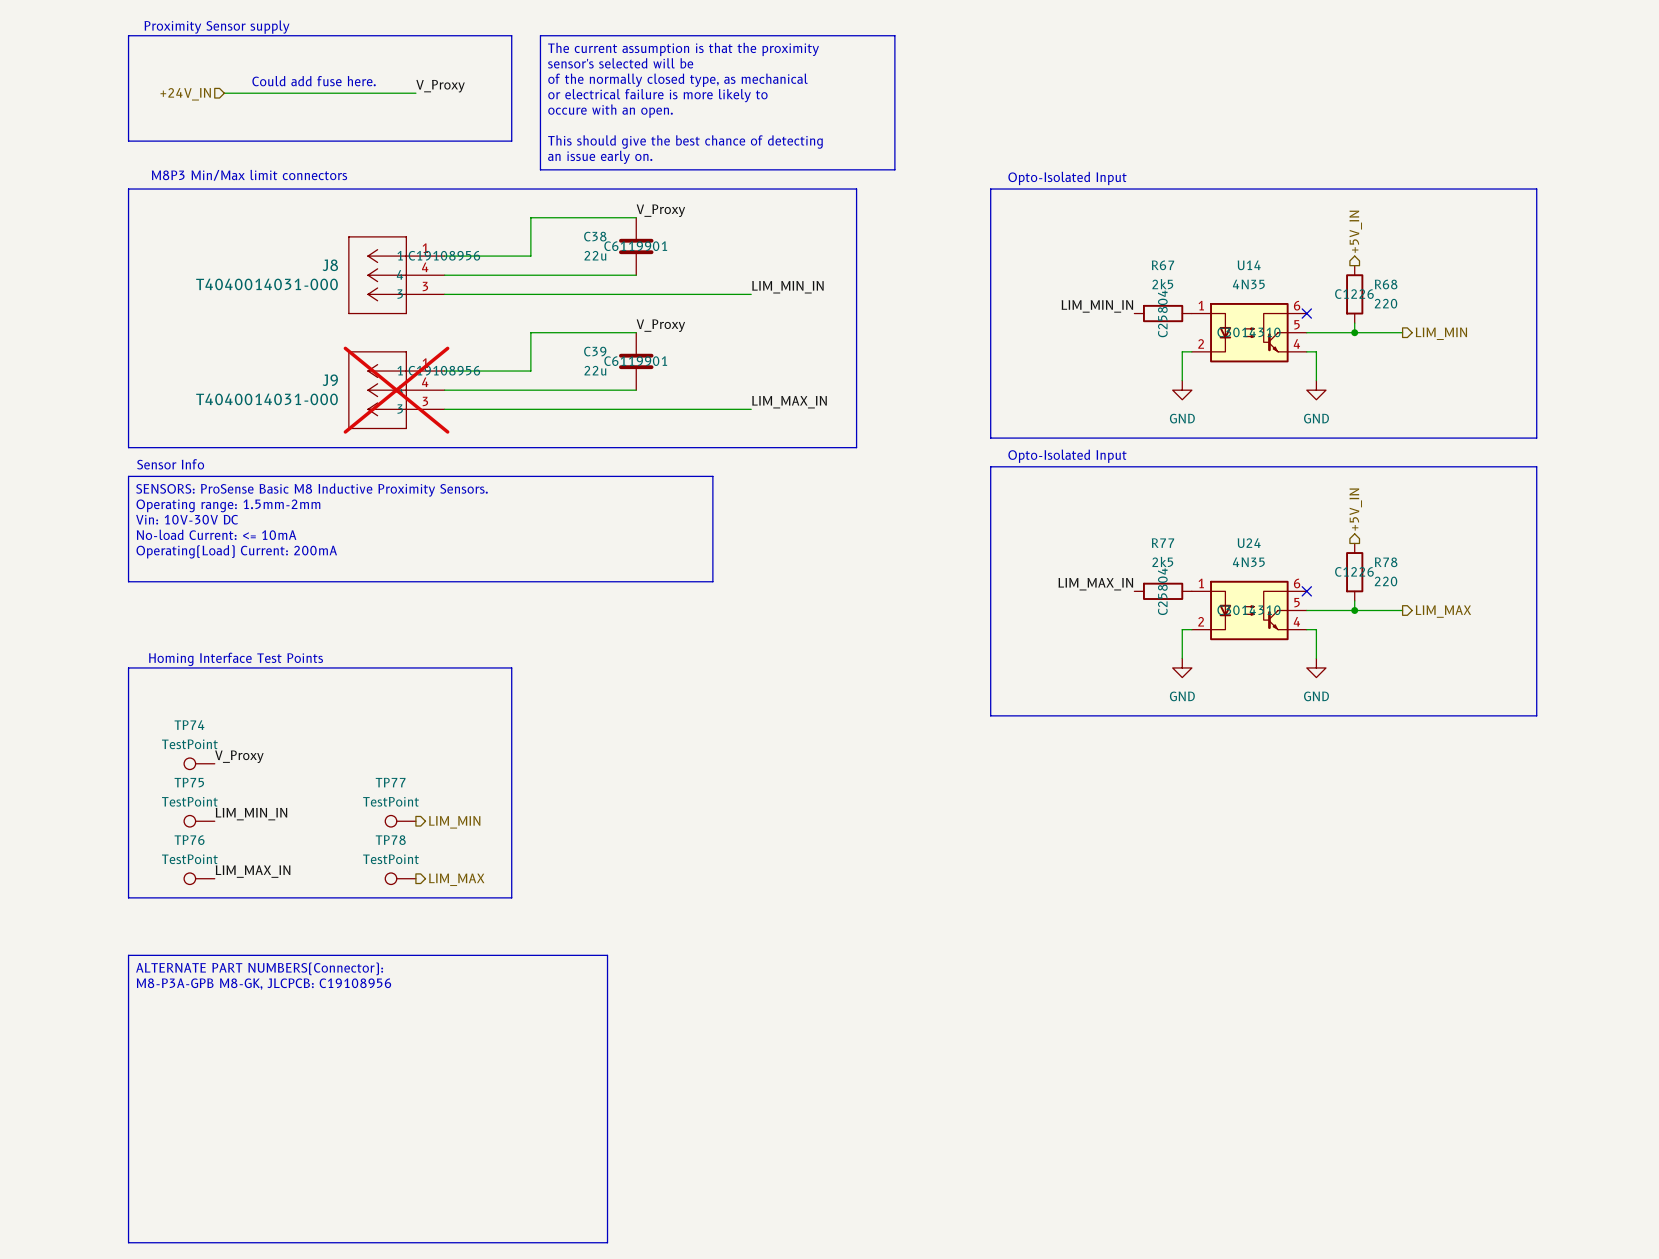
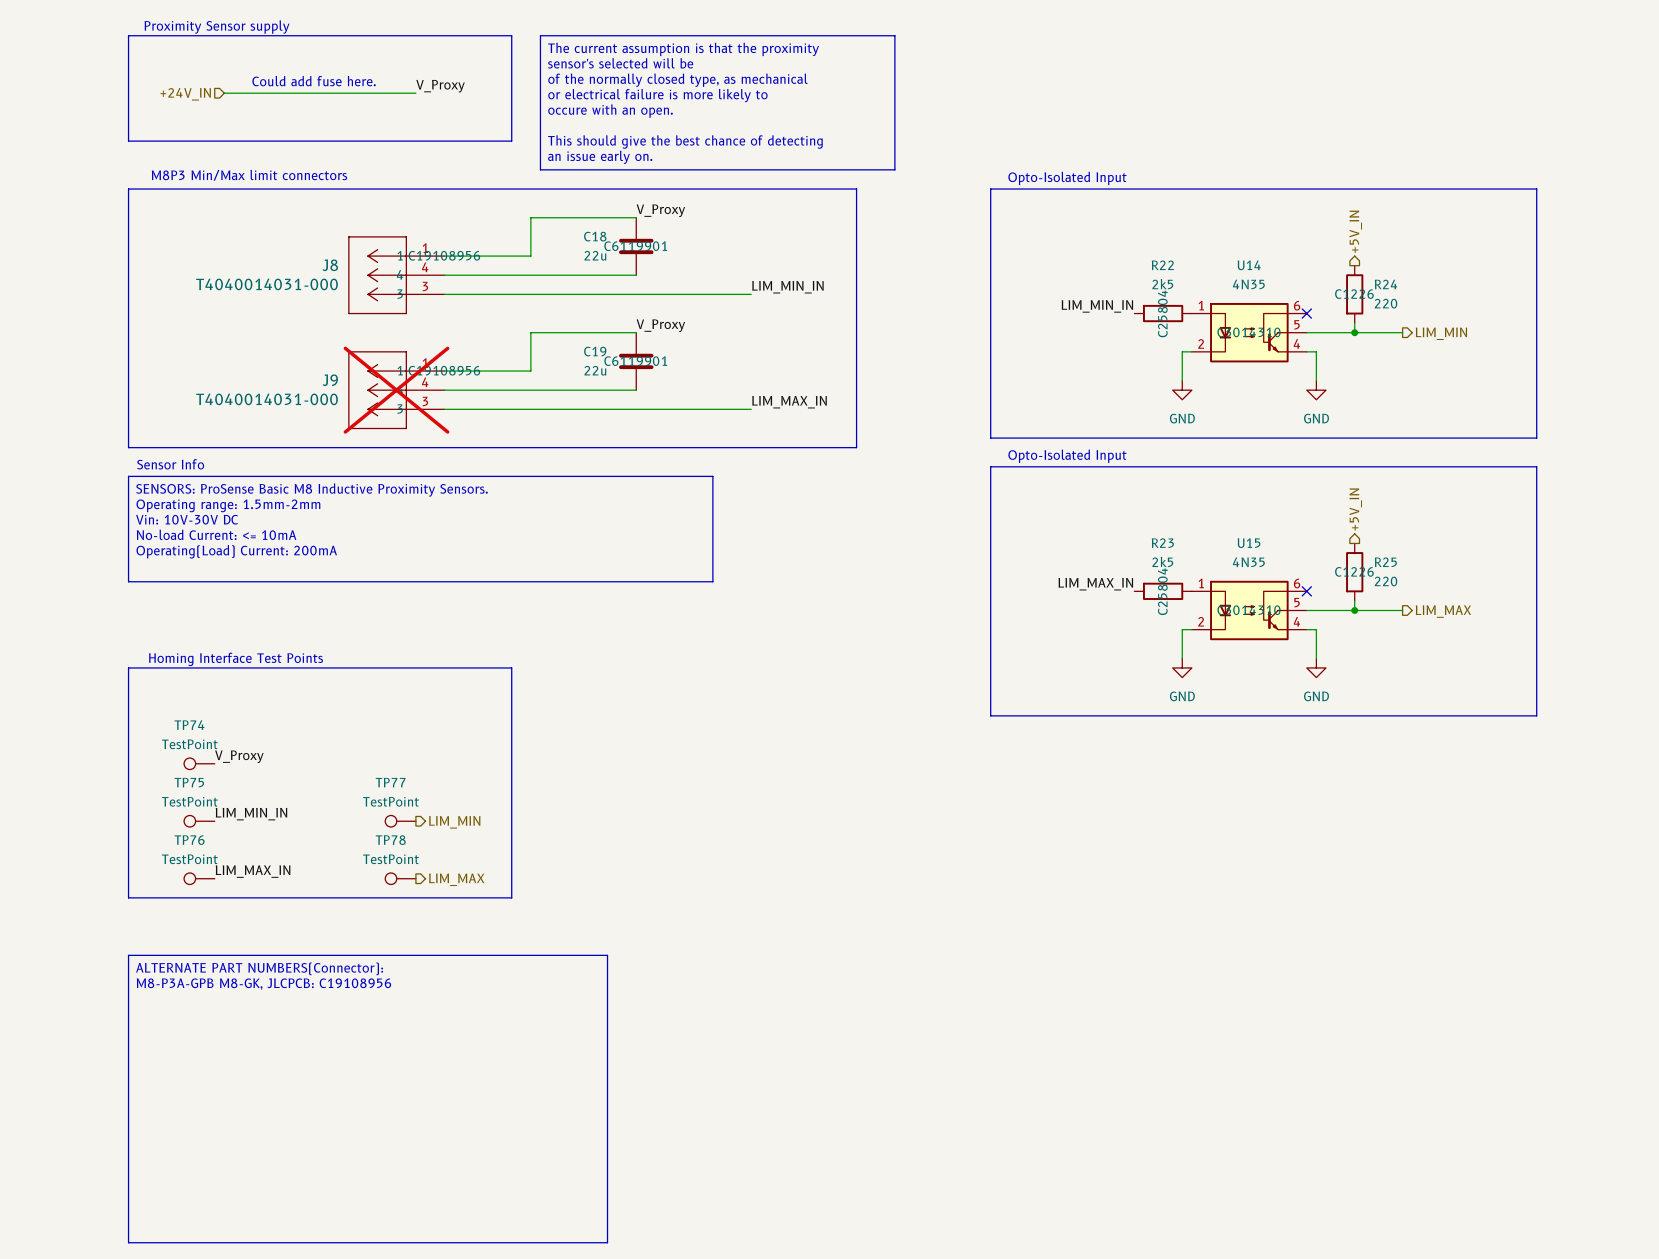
C38 name: C38 (595, 236) -> C18 (595, 236)
R67 name: R67 (1162, 265) -> R22 (1162, 265)
R68 name: R68 (1386, 284) -> R24 (1386, 284)
C39 name: C39 (595, 351) -> C19 (595, 351)
R77 name: R77 (1162, 543) -> R23 (1162, 543)
U24 name: U24 (1249, 543) -> U15 (1249, 543)
R78 name: R78 (1386, 562) -> R25 (1385, 562)

